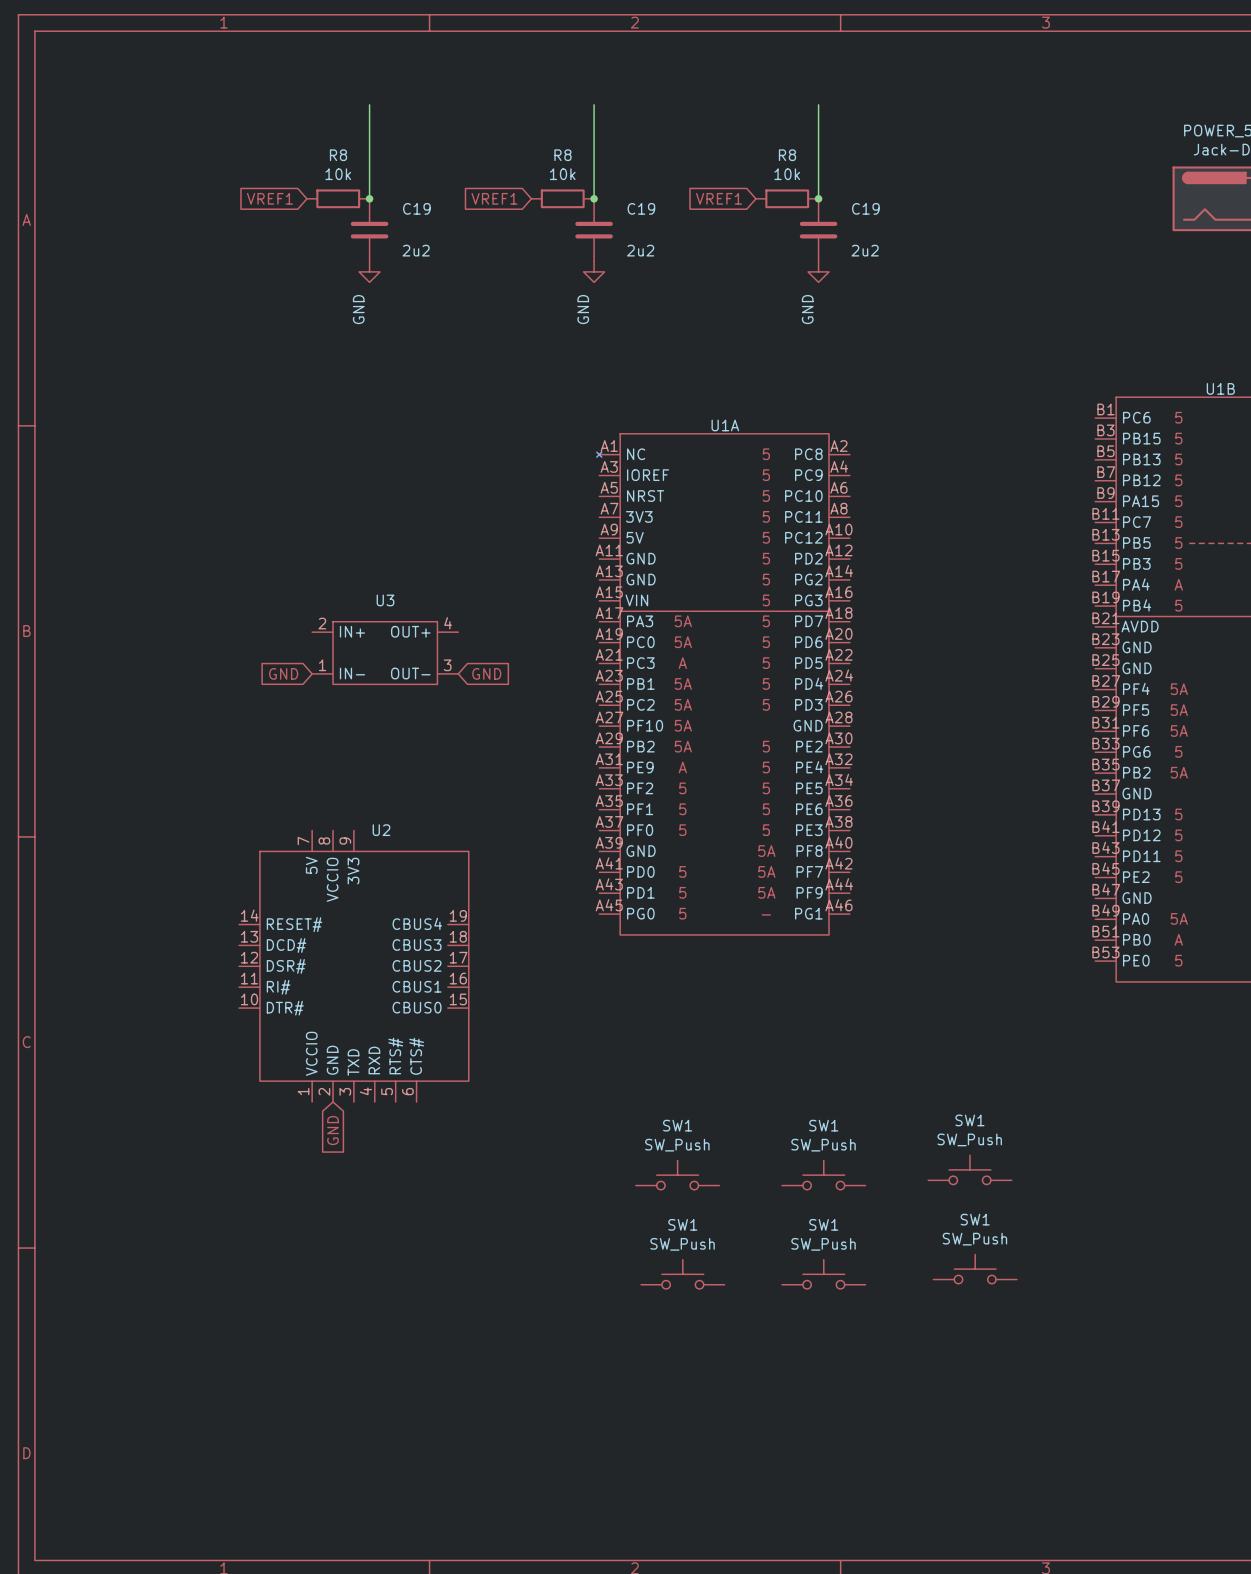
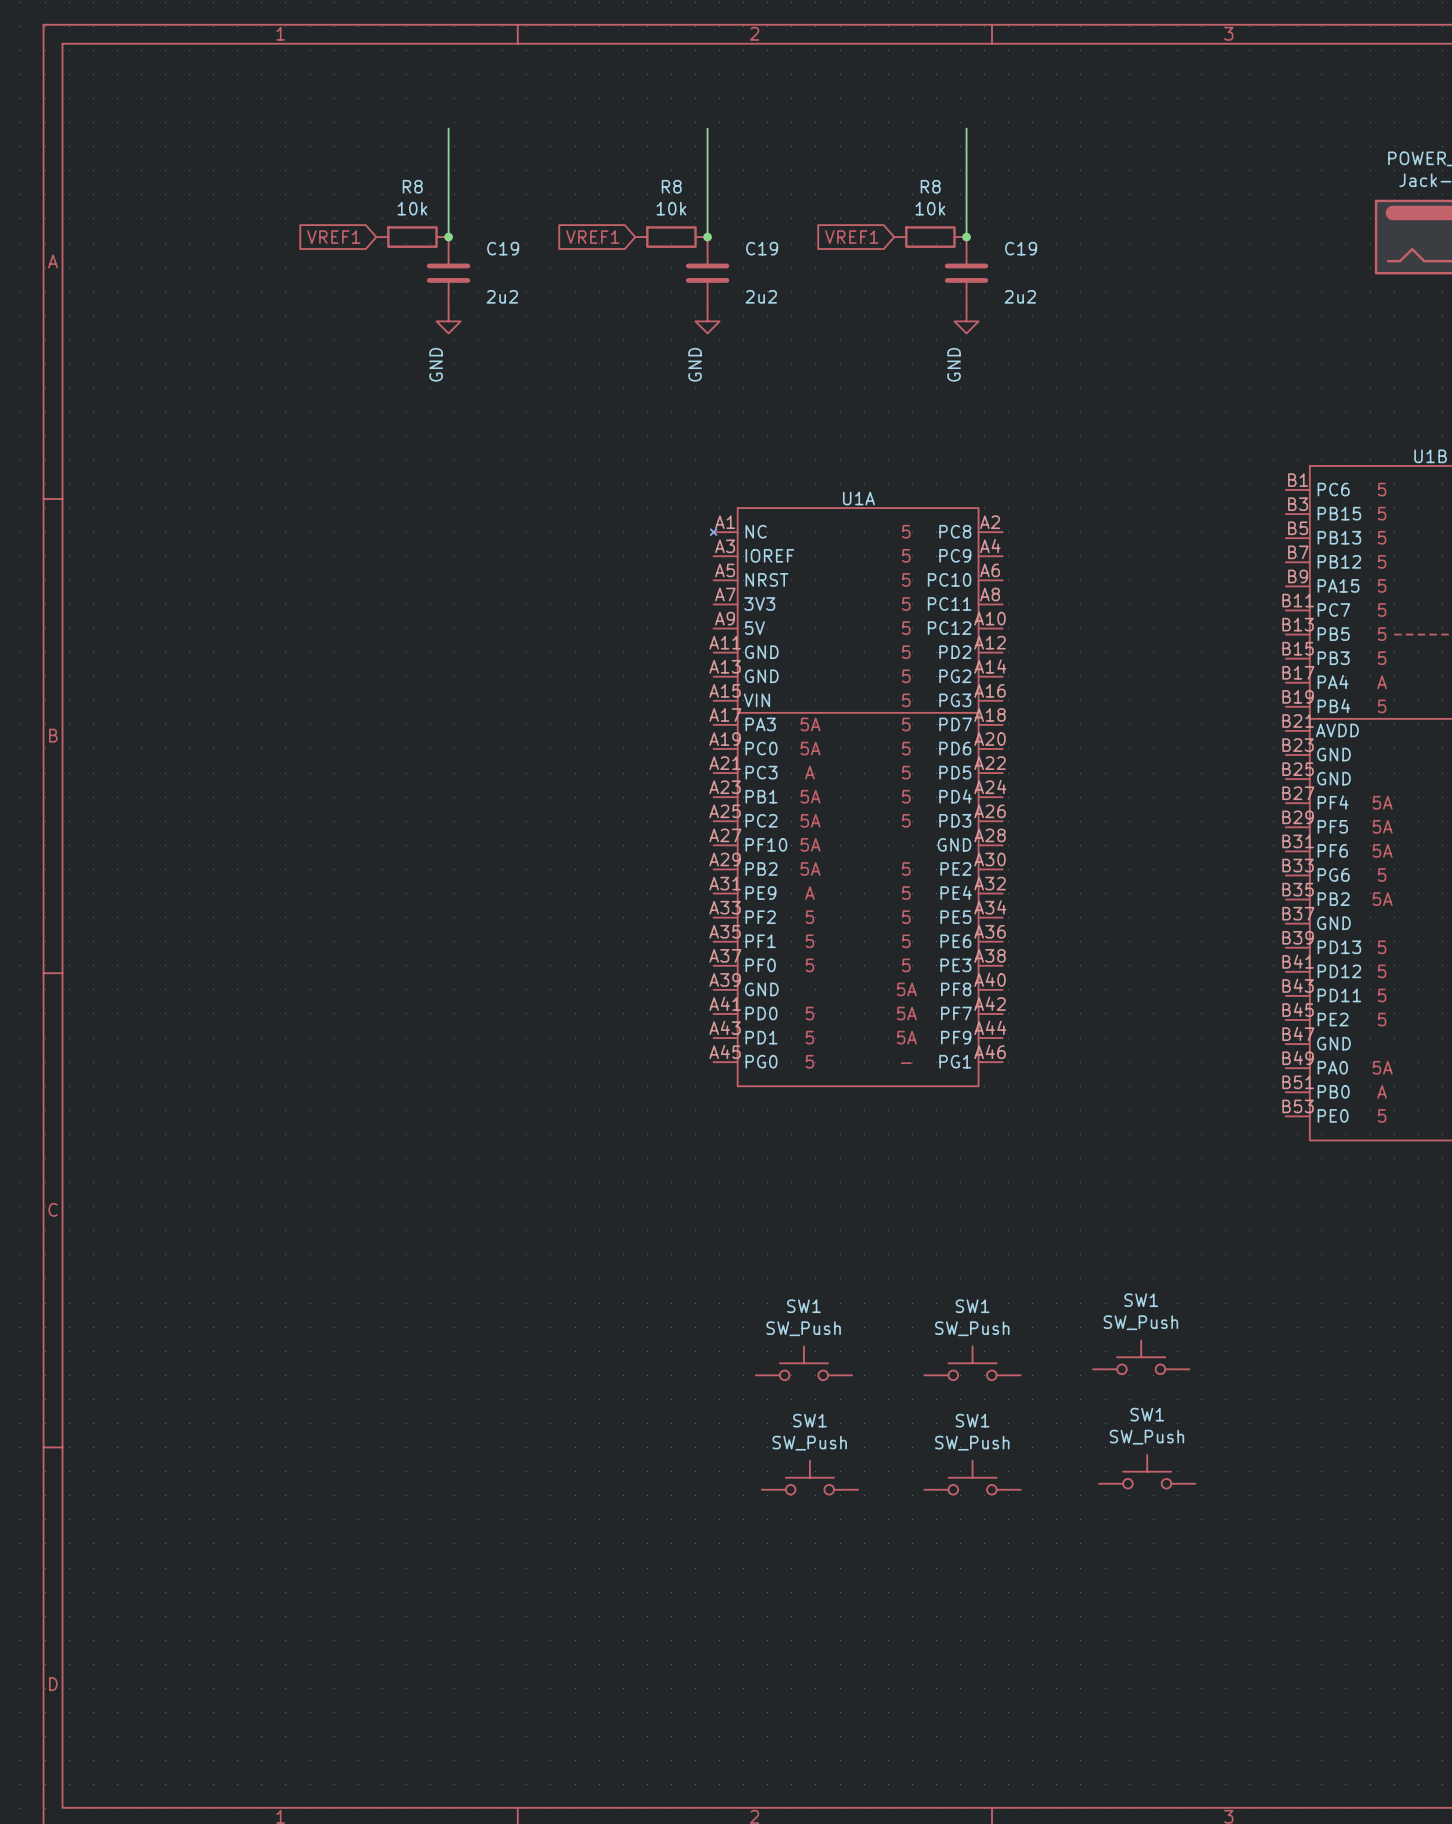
U3: (385, 653) -> none
global label: GND (283, 673) -> none
global label: GND (486, 673) -> none
U2: (353, 966) -> none
global label: GND (333, 1130) -> none

